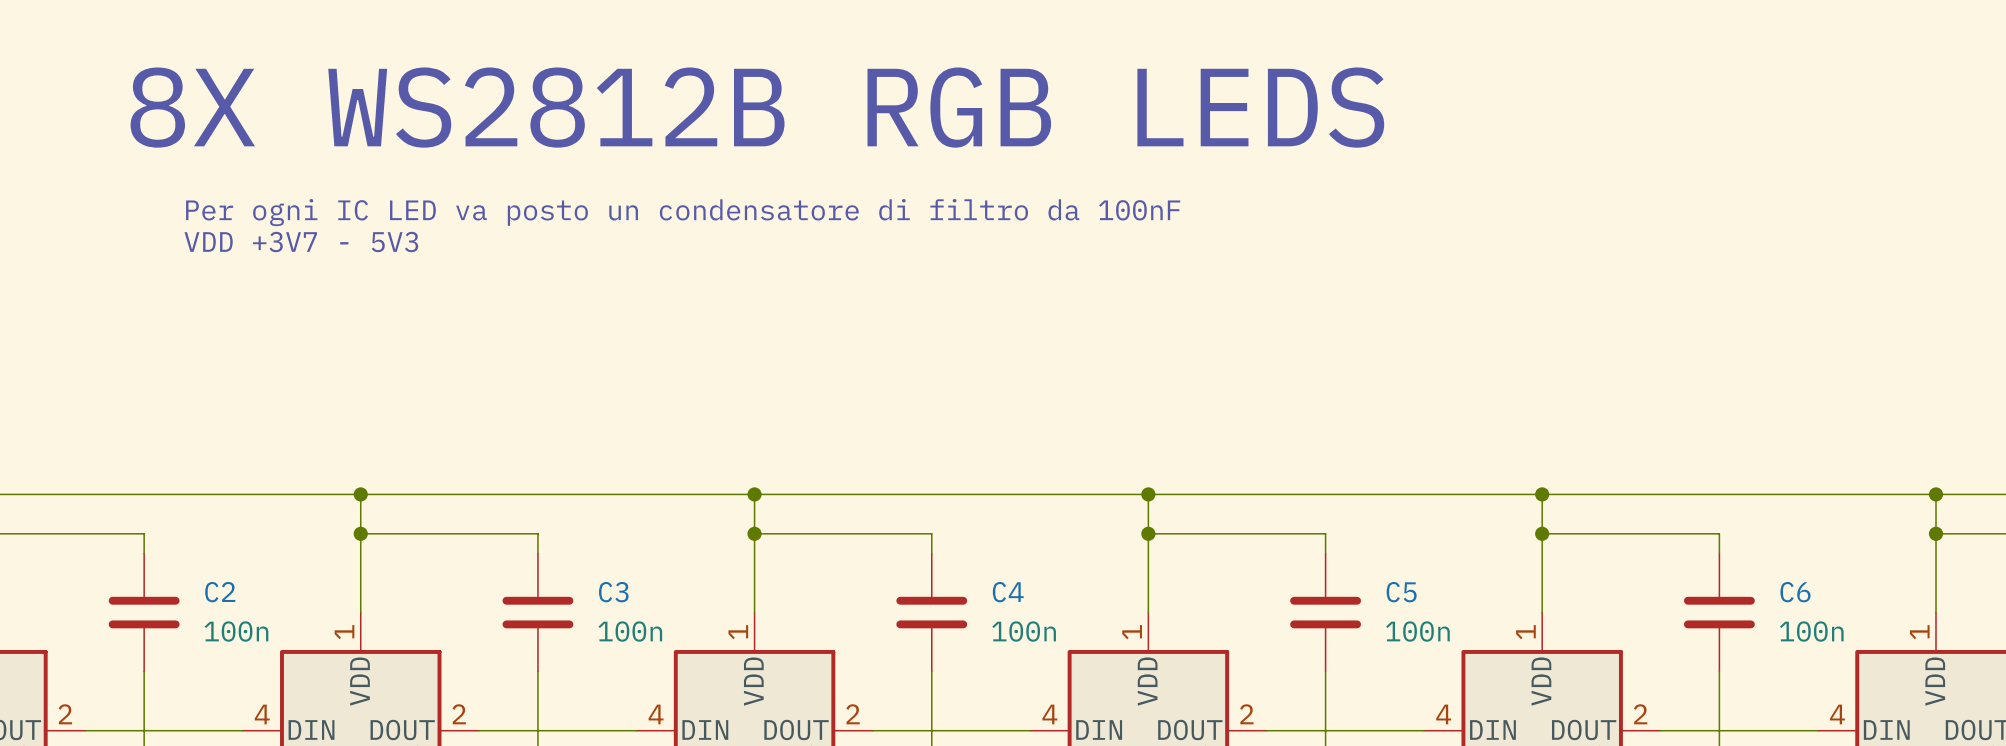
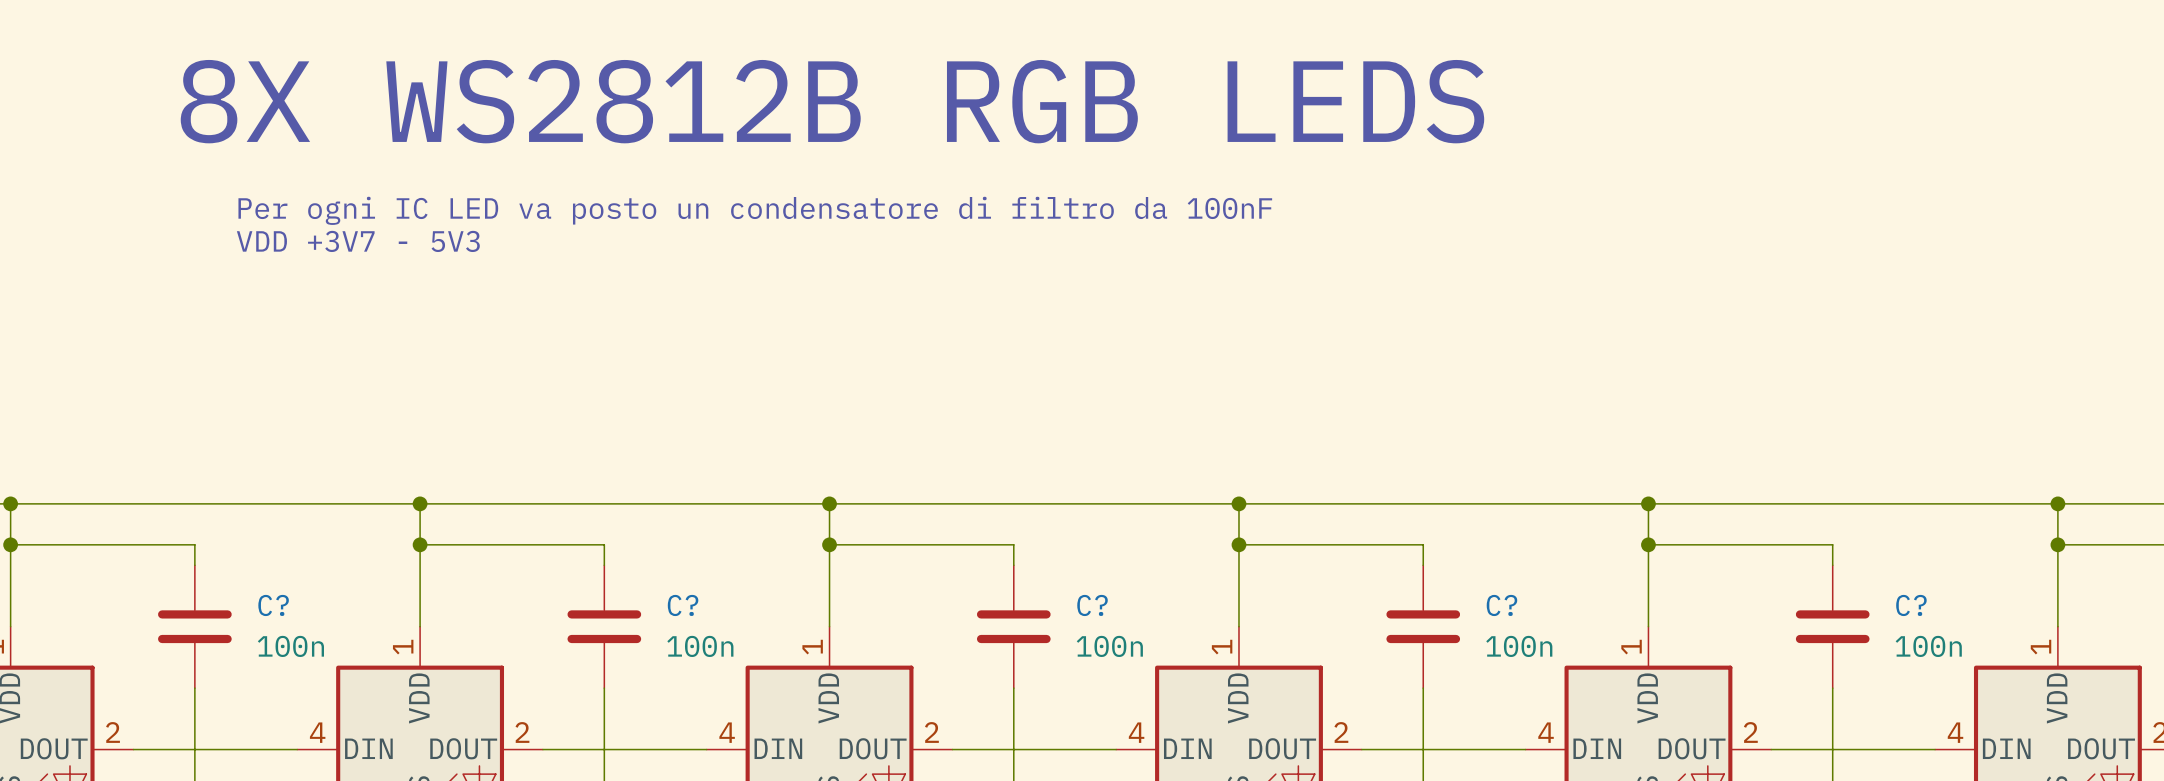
C2 name: C2 (220, 592) -> C? (273, 605)
C3 name: C3 (613, 592) -> C? (683, 605)
C4 name: C4 (1008, 592) -> C? (1092, 605)
C5 name: C5 (1401, 592) -> C? (1501, 605)
C6 name: C6 (1795, 592) -> C? (1911, 605)

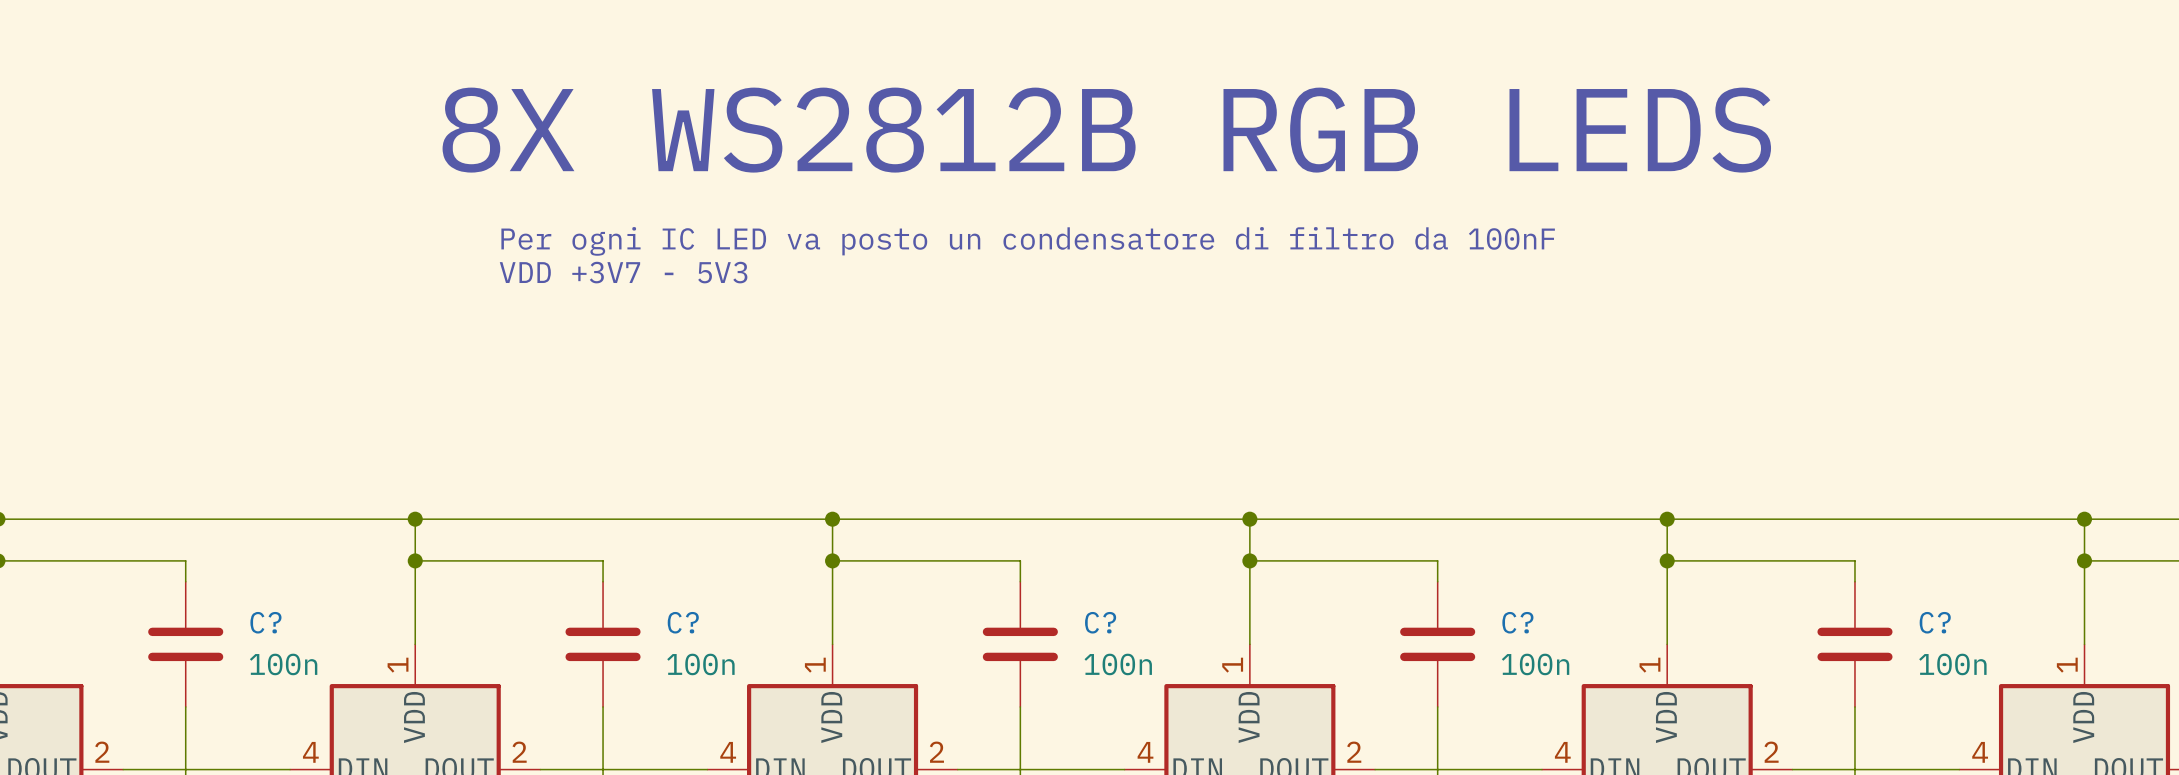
text position: 8X WS2812B RGB LEDS (832, 101) -> 8X WS2812B RGB LEDS (1106, 130)
text position: Per ogni IC LED va posto un condensatore di filtro da 100nF (755, 210) -> Per ogni IC LED va posto un condensatore di filtro da 100nF (1028, 241)
text position: VDD +3V7 - 5V3 (358, 241) -> VDD +3V7 - 5V3 (623, 272)

